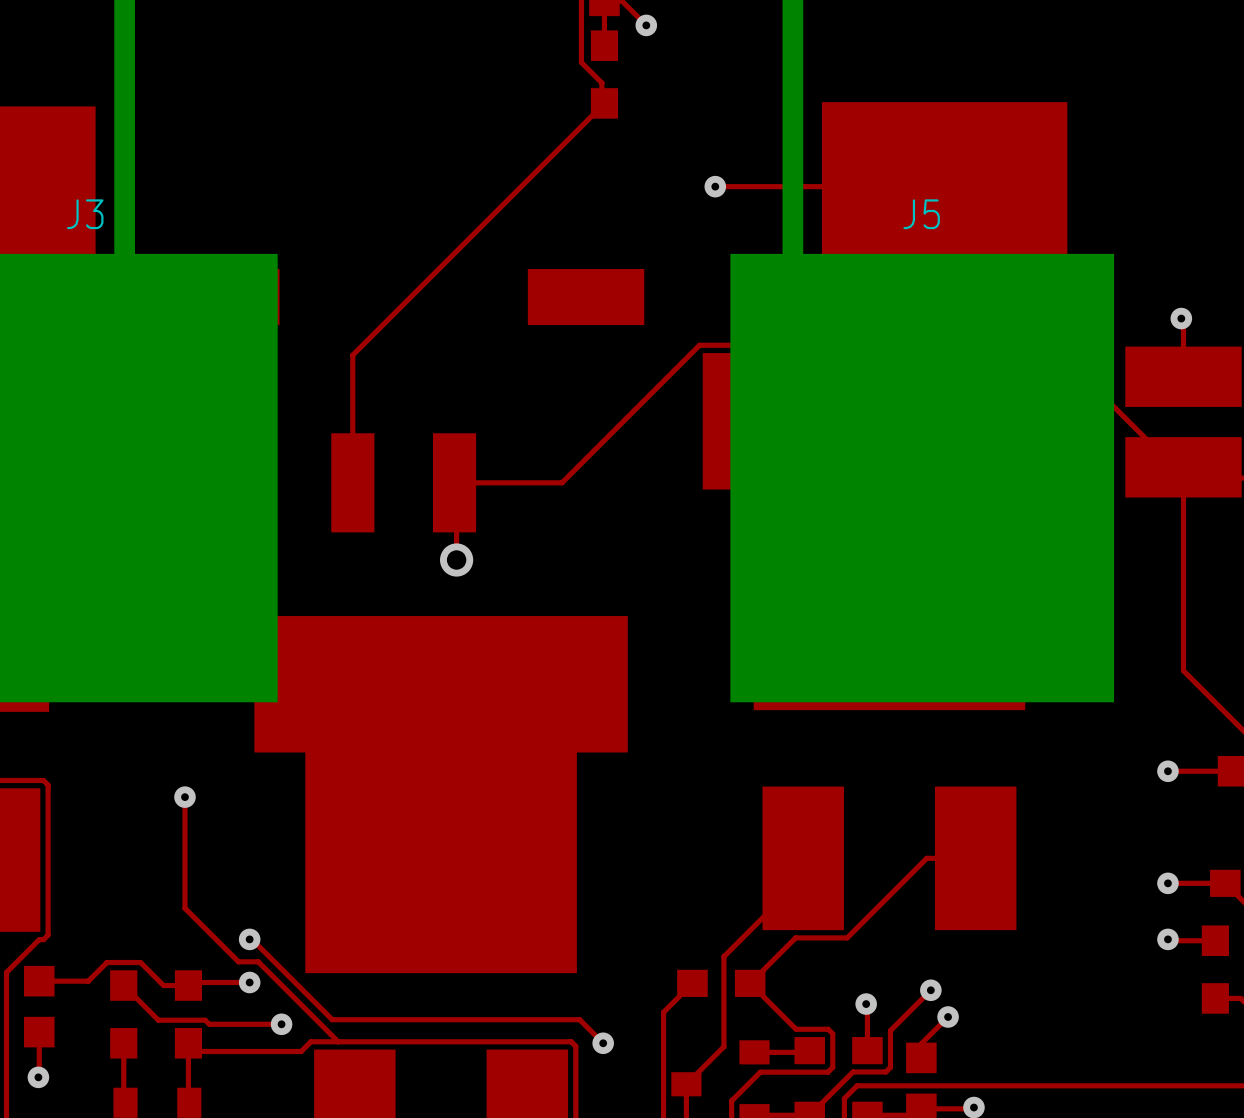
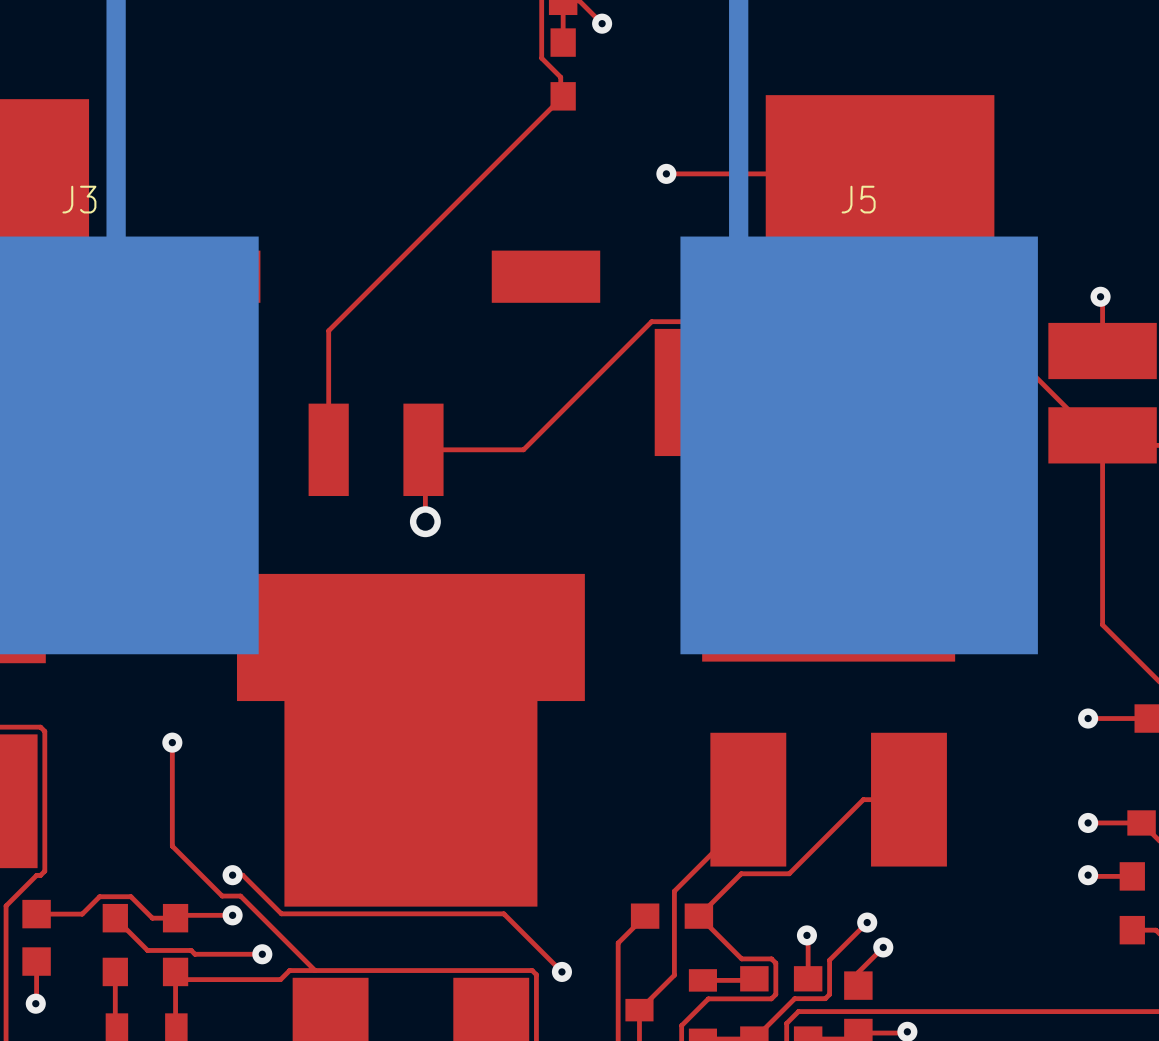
top track: (251, 939) (332, 1019) (579, 1019) -> (234, 875) (242, 875) (281, 913) (503, 913) (540, 950)

